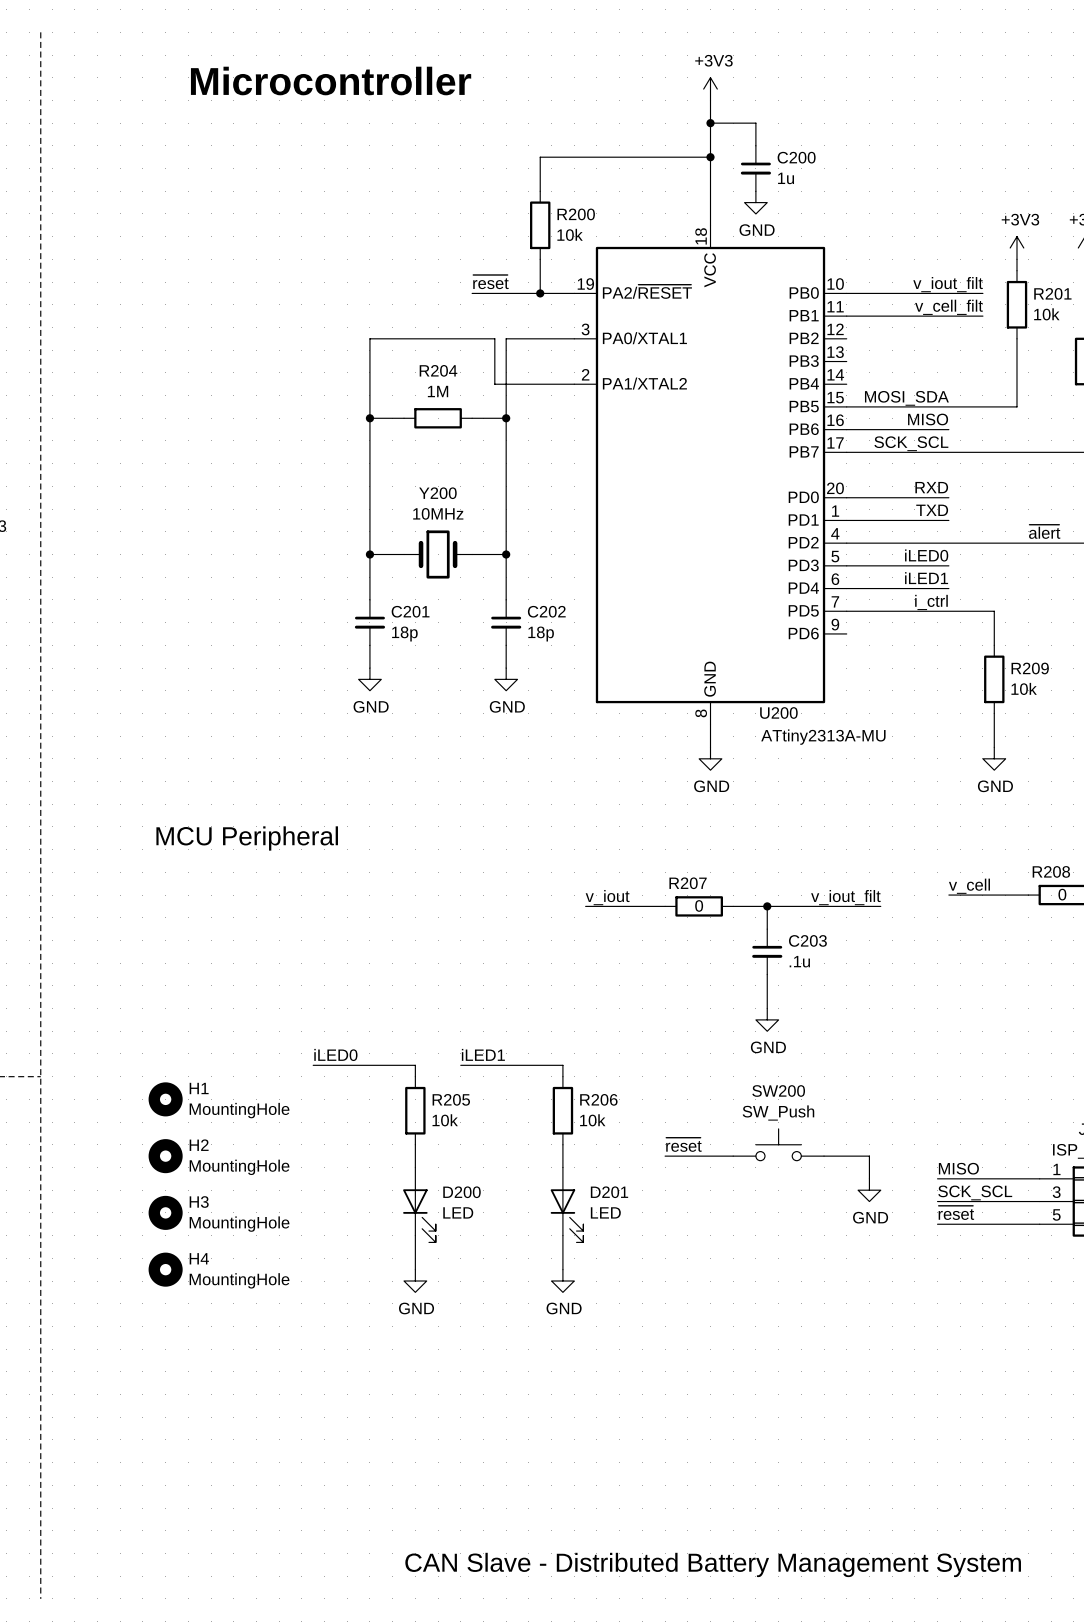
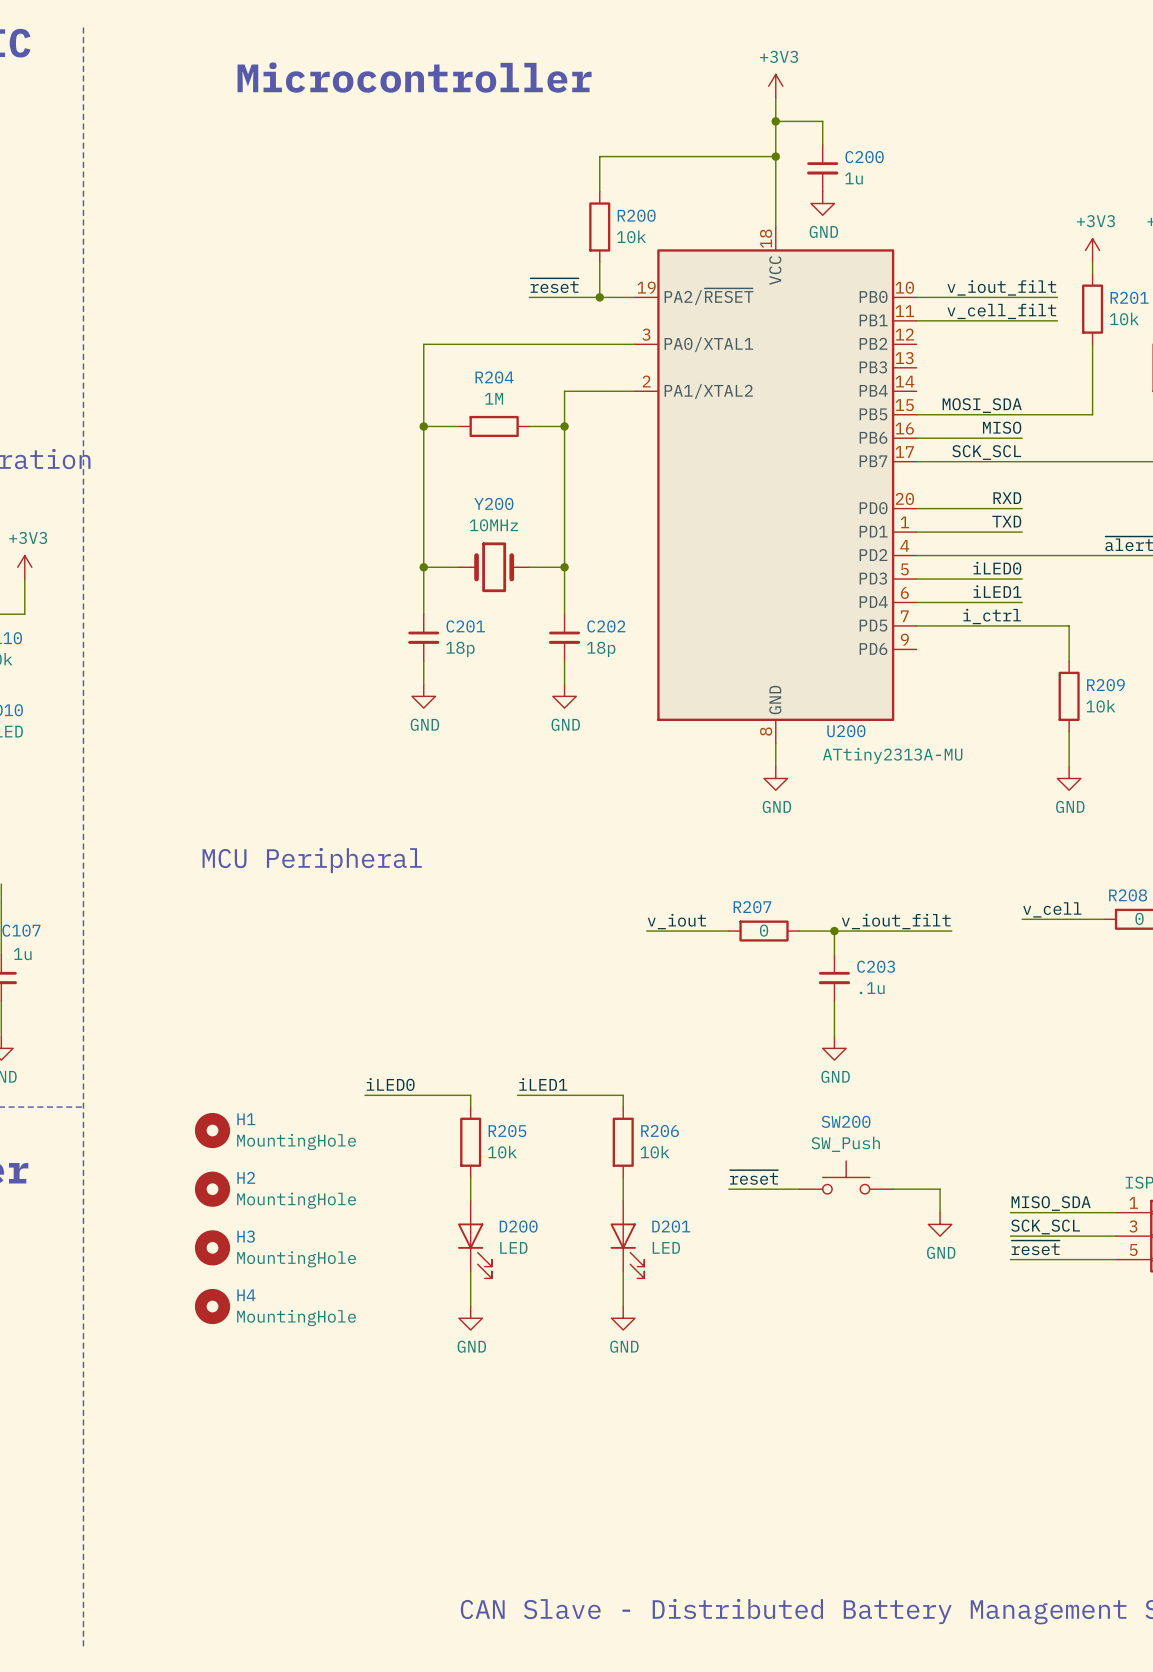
wire: (494, 338) (494, 384) (506, 384) (506, 338) -> (552, 344) (564, 344)
label: MISO (958, 1168) -> MISO_SDA (1051, 1203)

